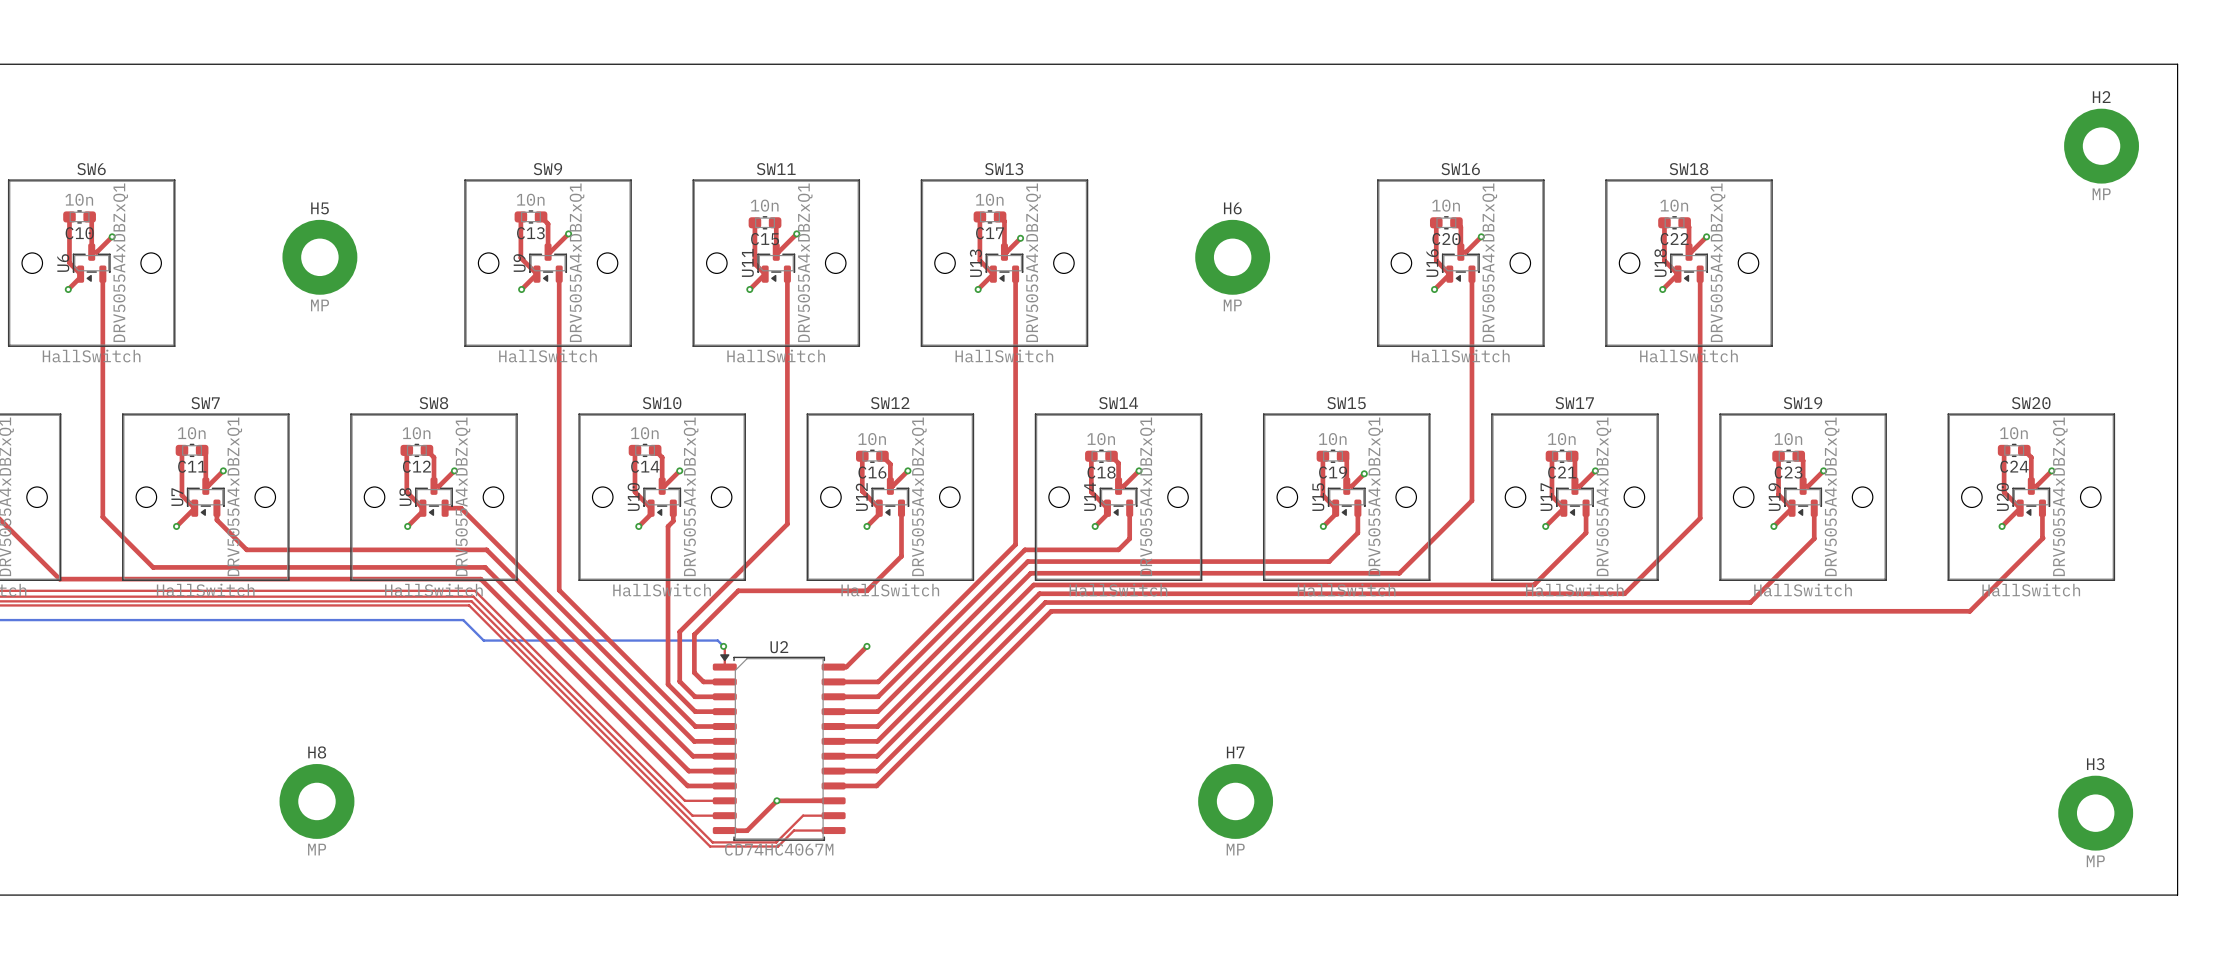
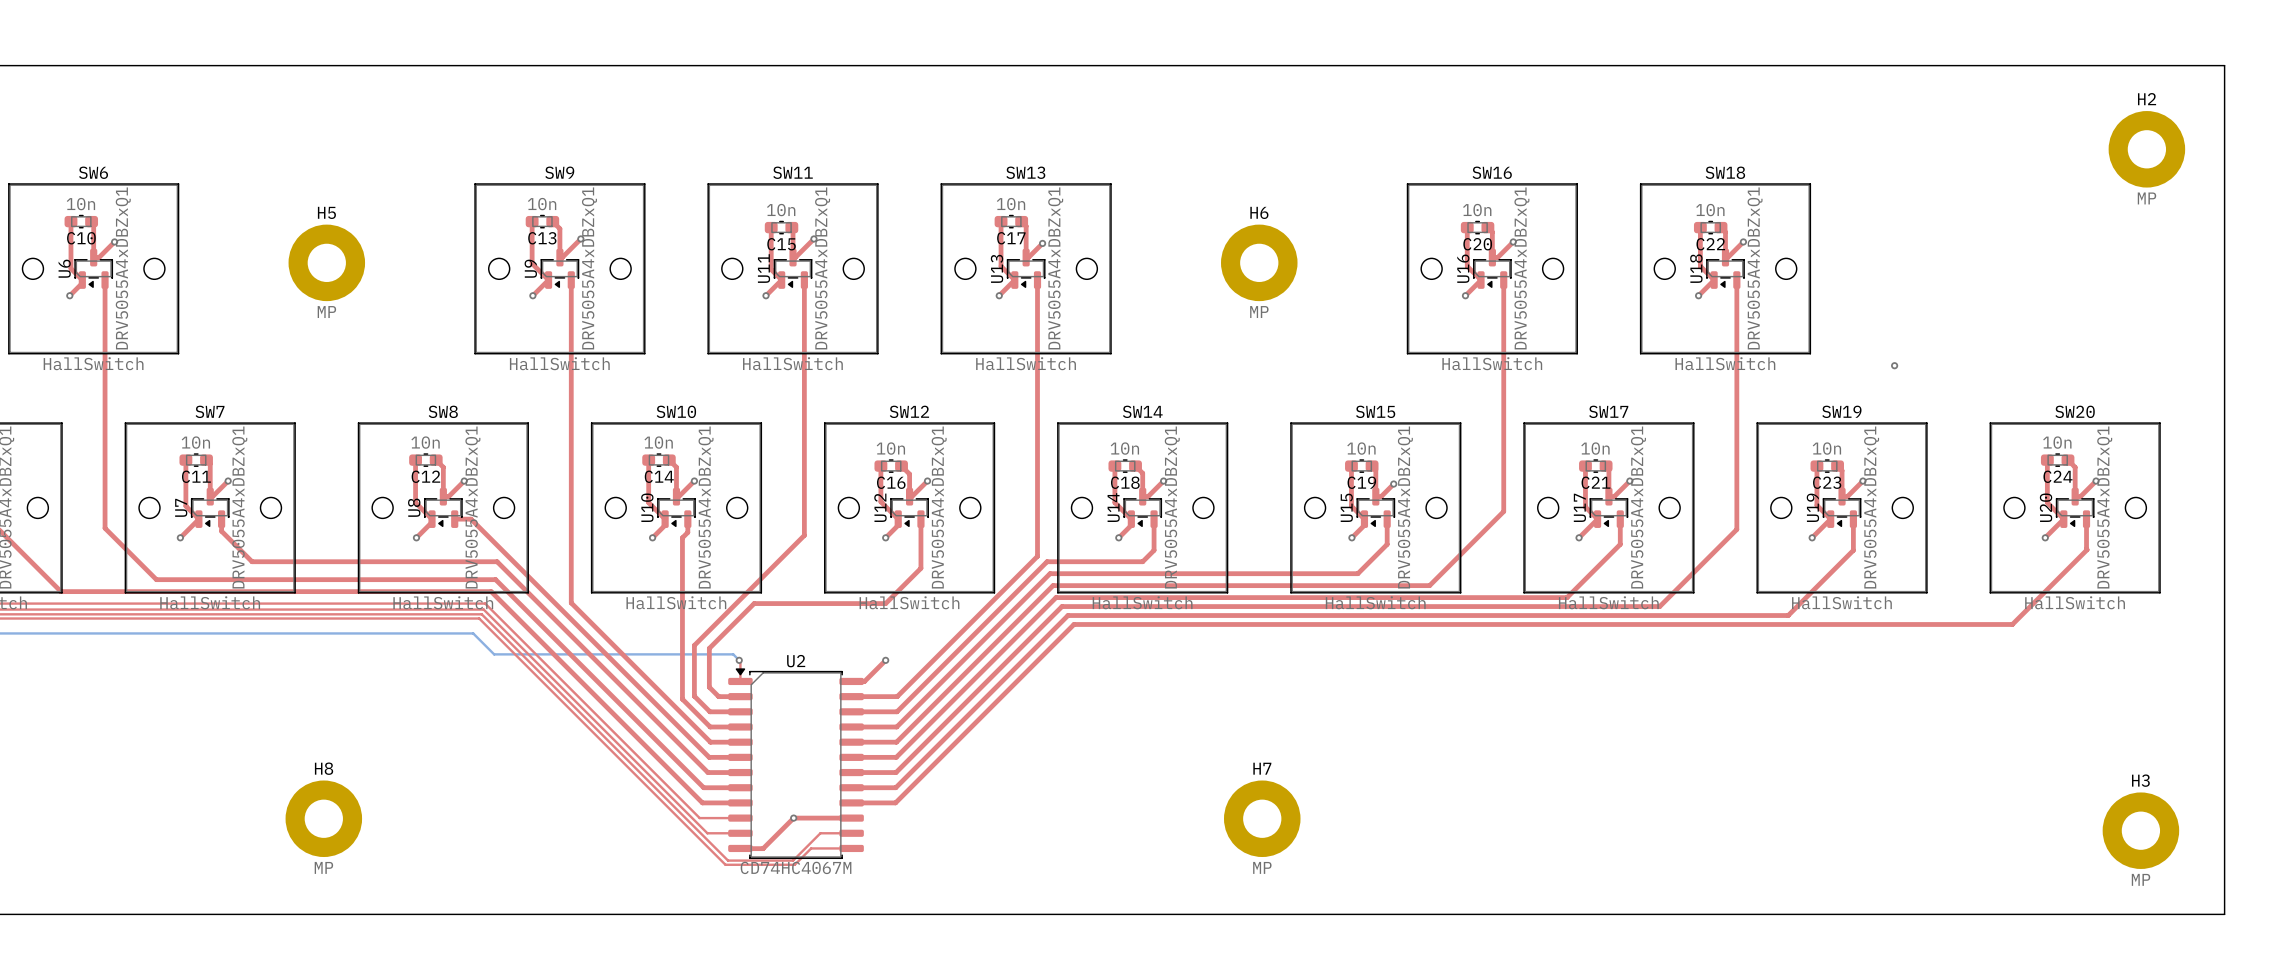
via: none -> (1894, 365)

